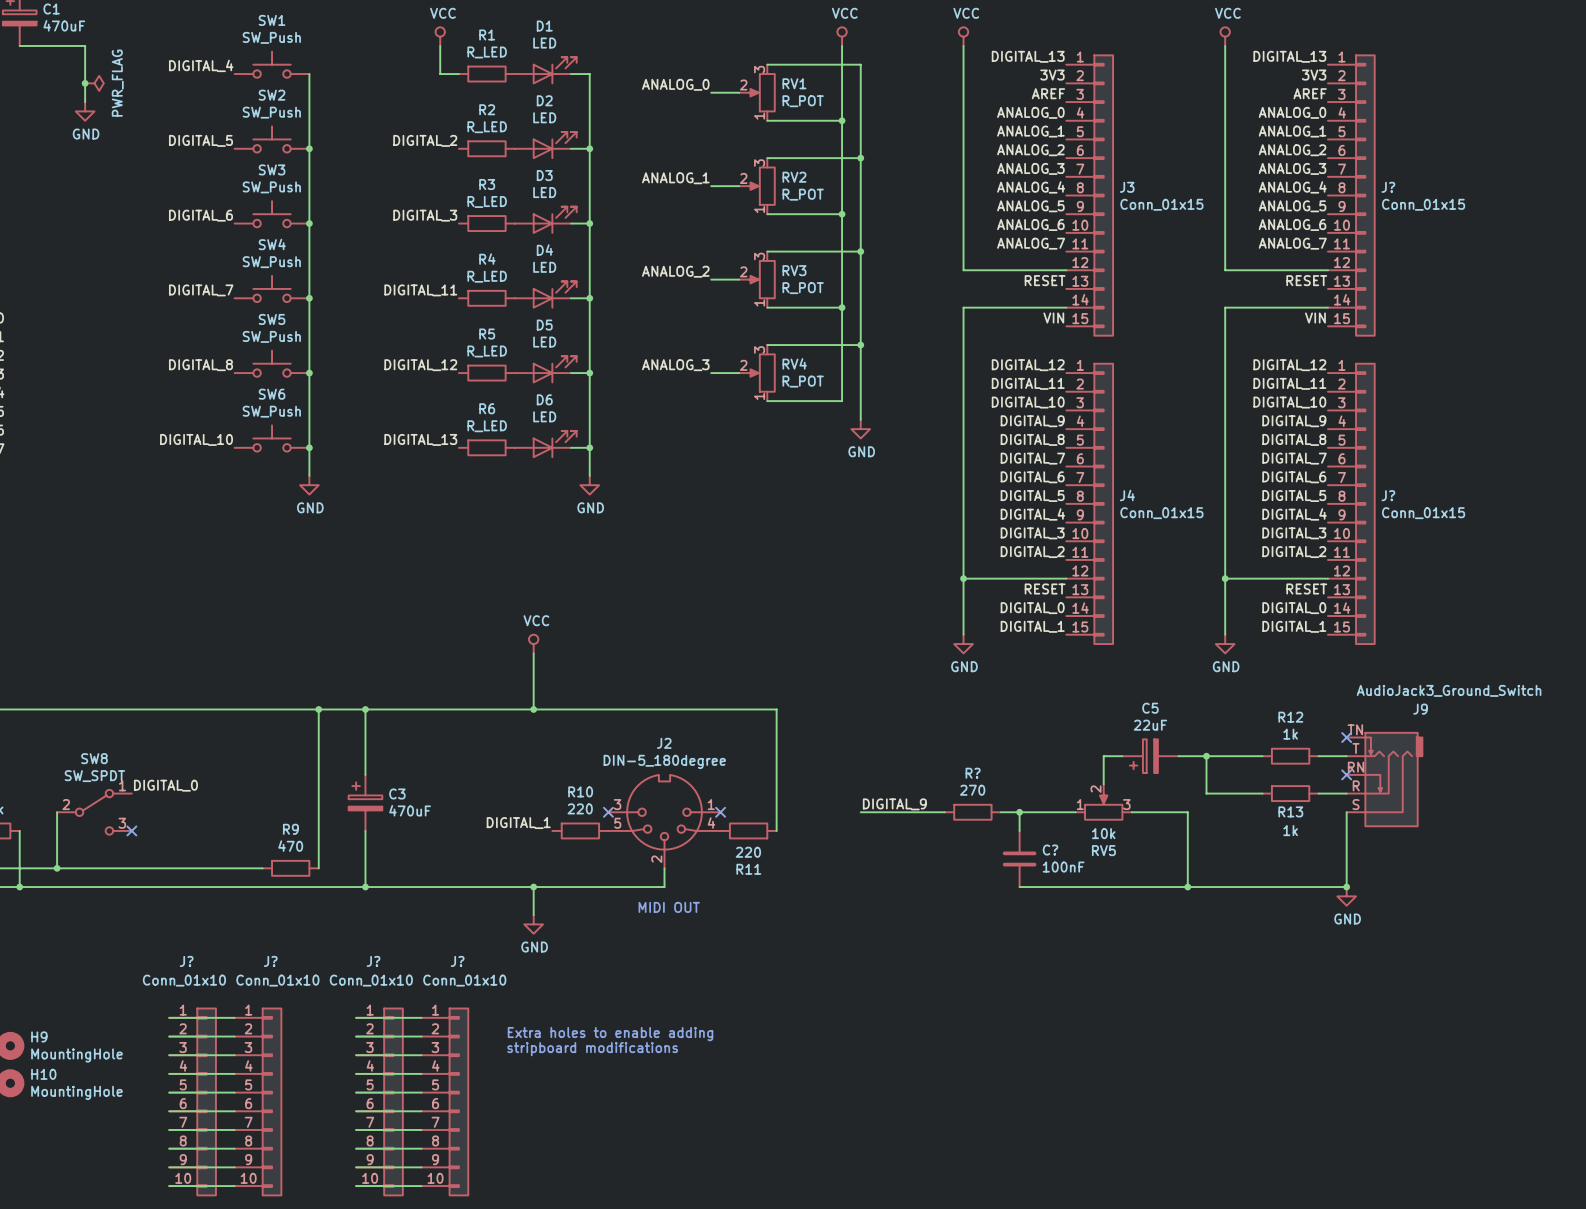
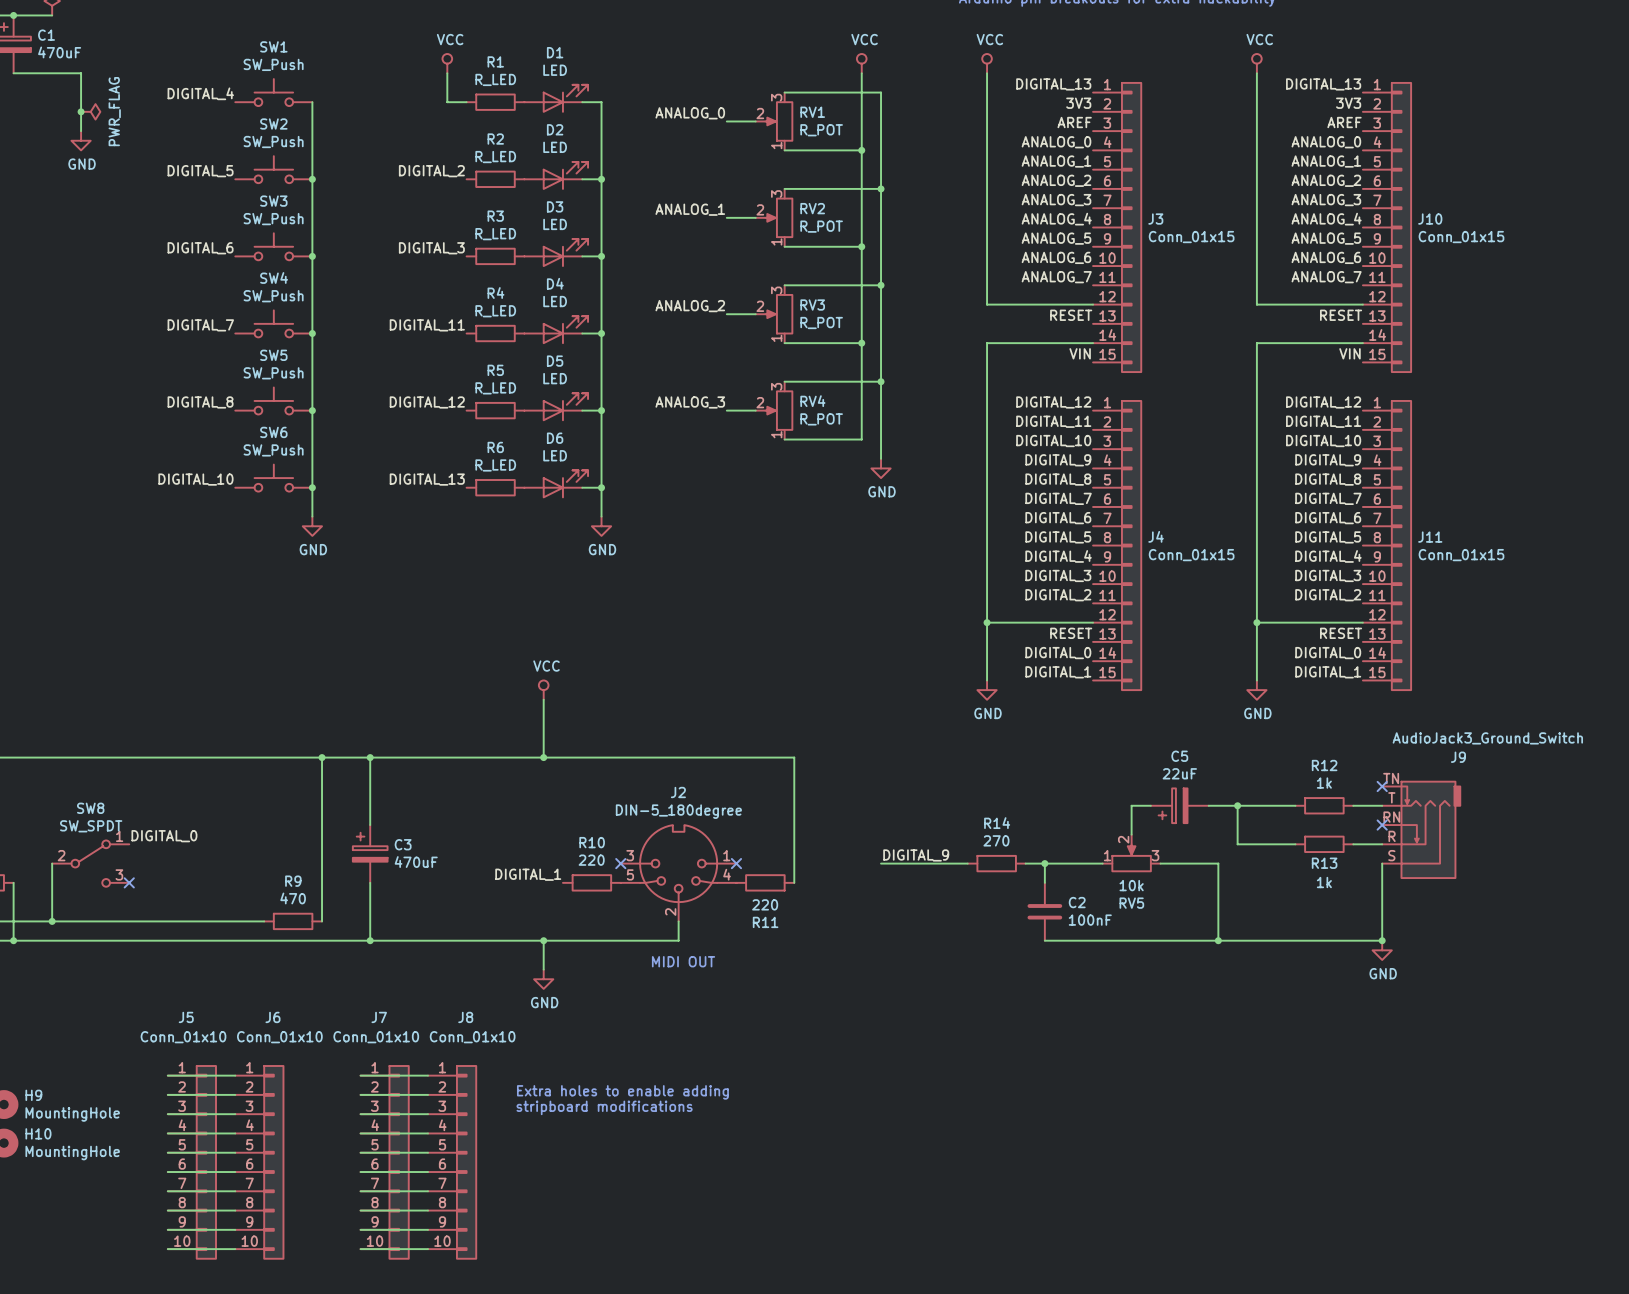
J? name: J? (1388, 187) -> J10 (1430, 219)
J? name: J? (1388, 495) -> J11 (1430, 537)
R? name: R? (973, 773) -> R14 (997, 823)
C? name: C? (1050, 850) -> C2 (1077, 902)
J? name: J? (186, 961) -> J5 (186, 1017)
J? name: J? (270, 961) -> J6 (272, 1017)
J? name: J? (373, 961) -> J7 (379, 1017)
J? name: J? (457, 961) -> J8 (465, 1017)

